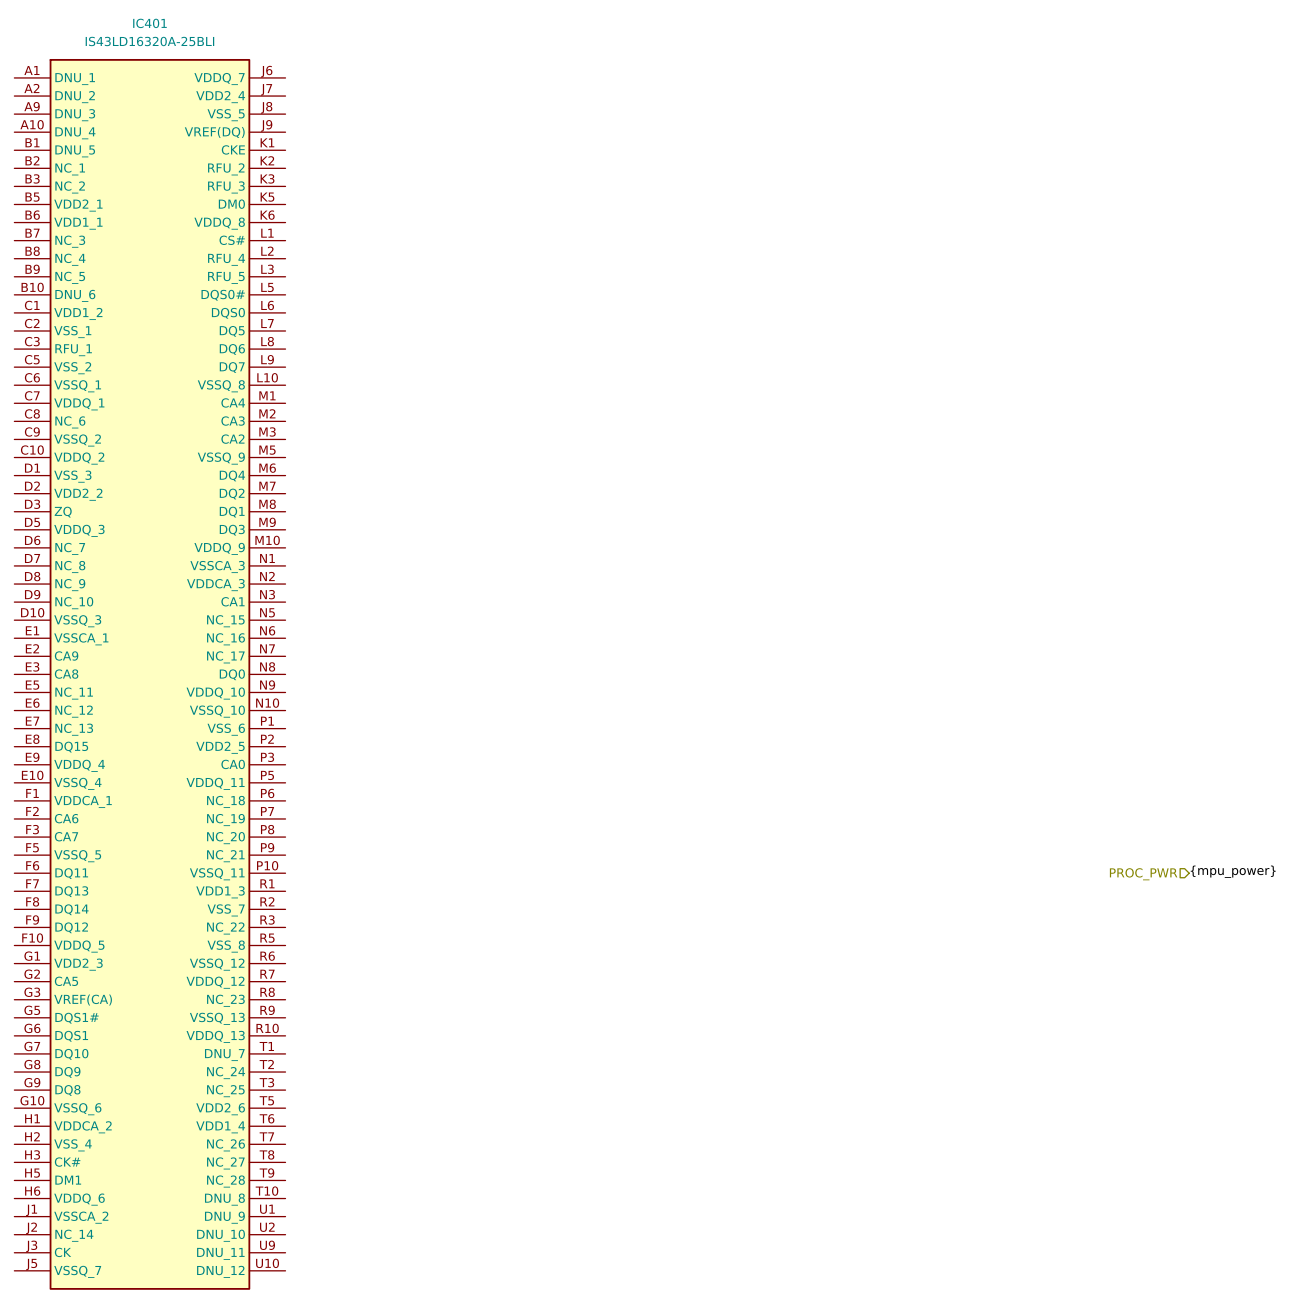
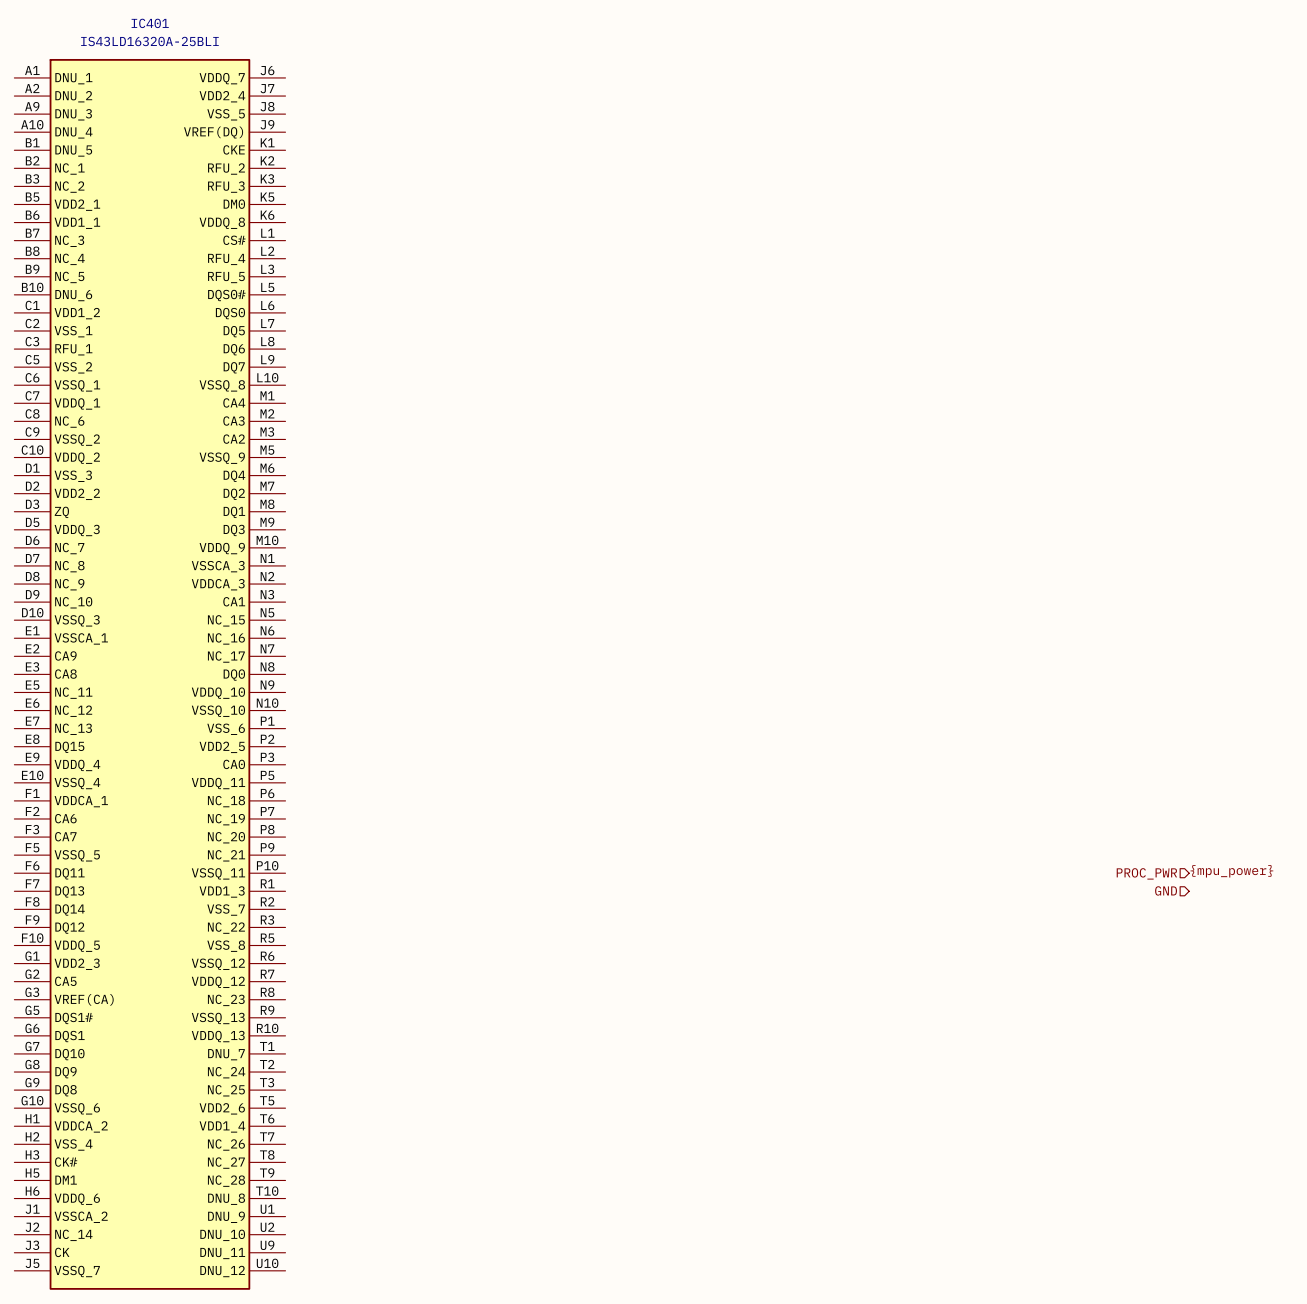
hierarchical label: none -> GND (1166, 890)

